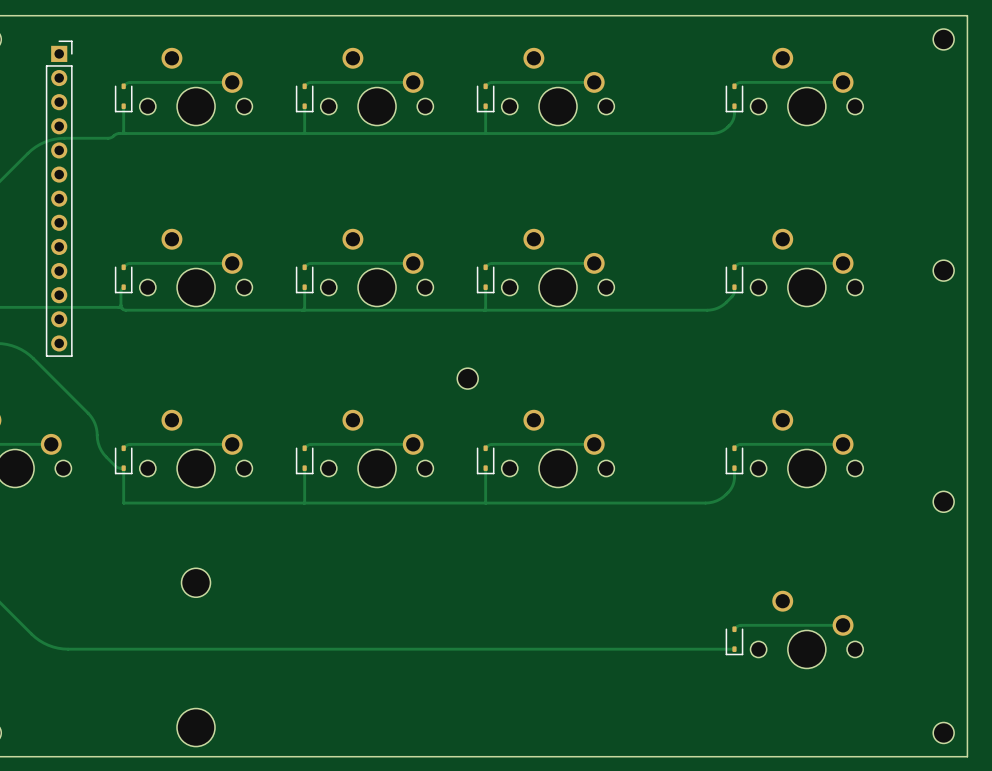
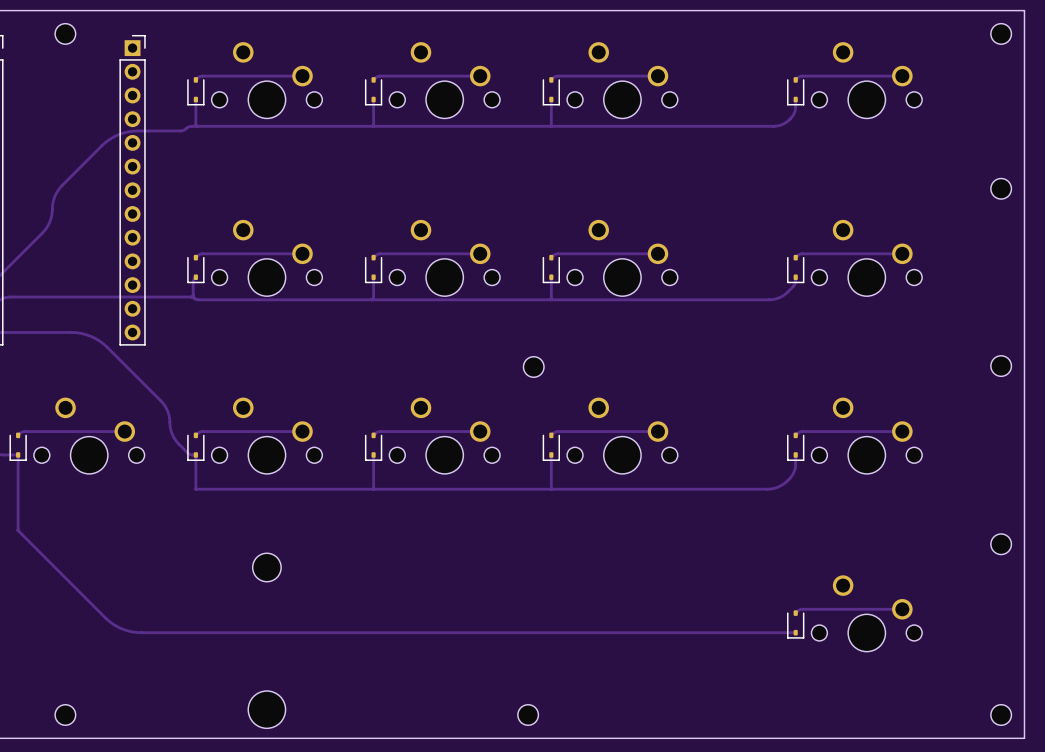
part: none -> (1001, 188)
part: (943, 270) -> none
part: none -> (1001, 366)
part position: (943, 501) -> (1001, 544)
part: none -> (528, 714)

